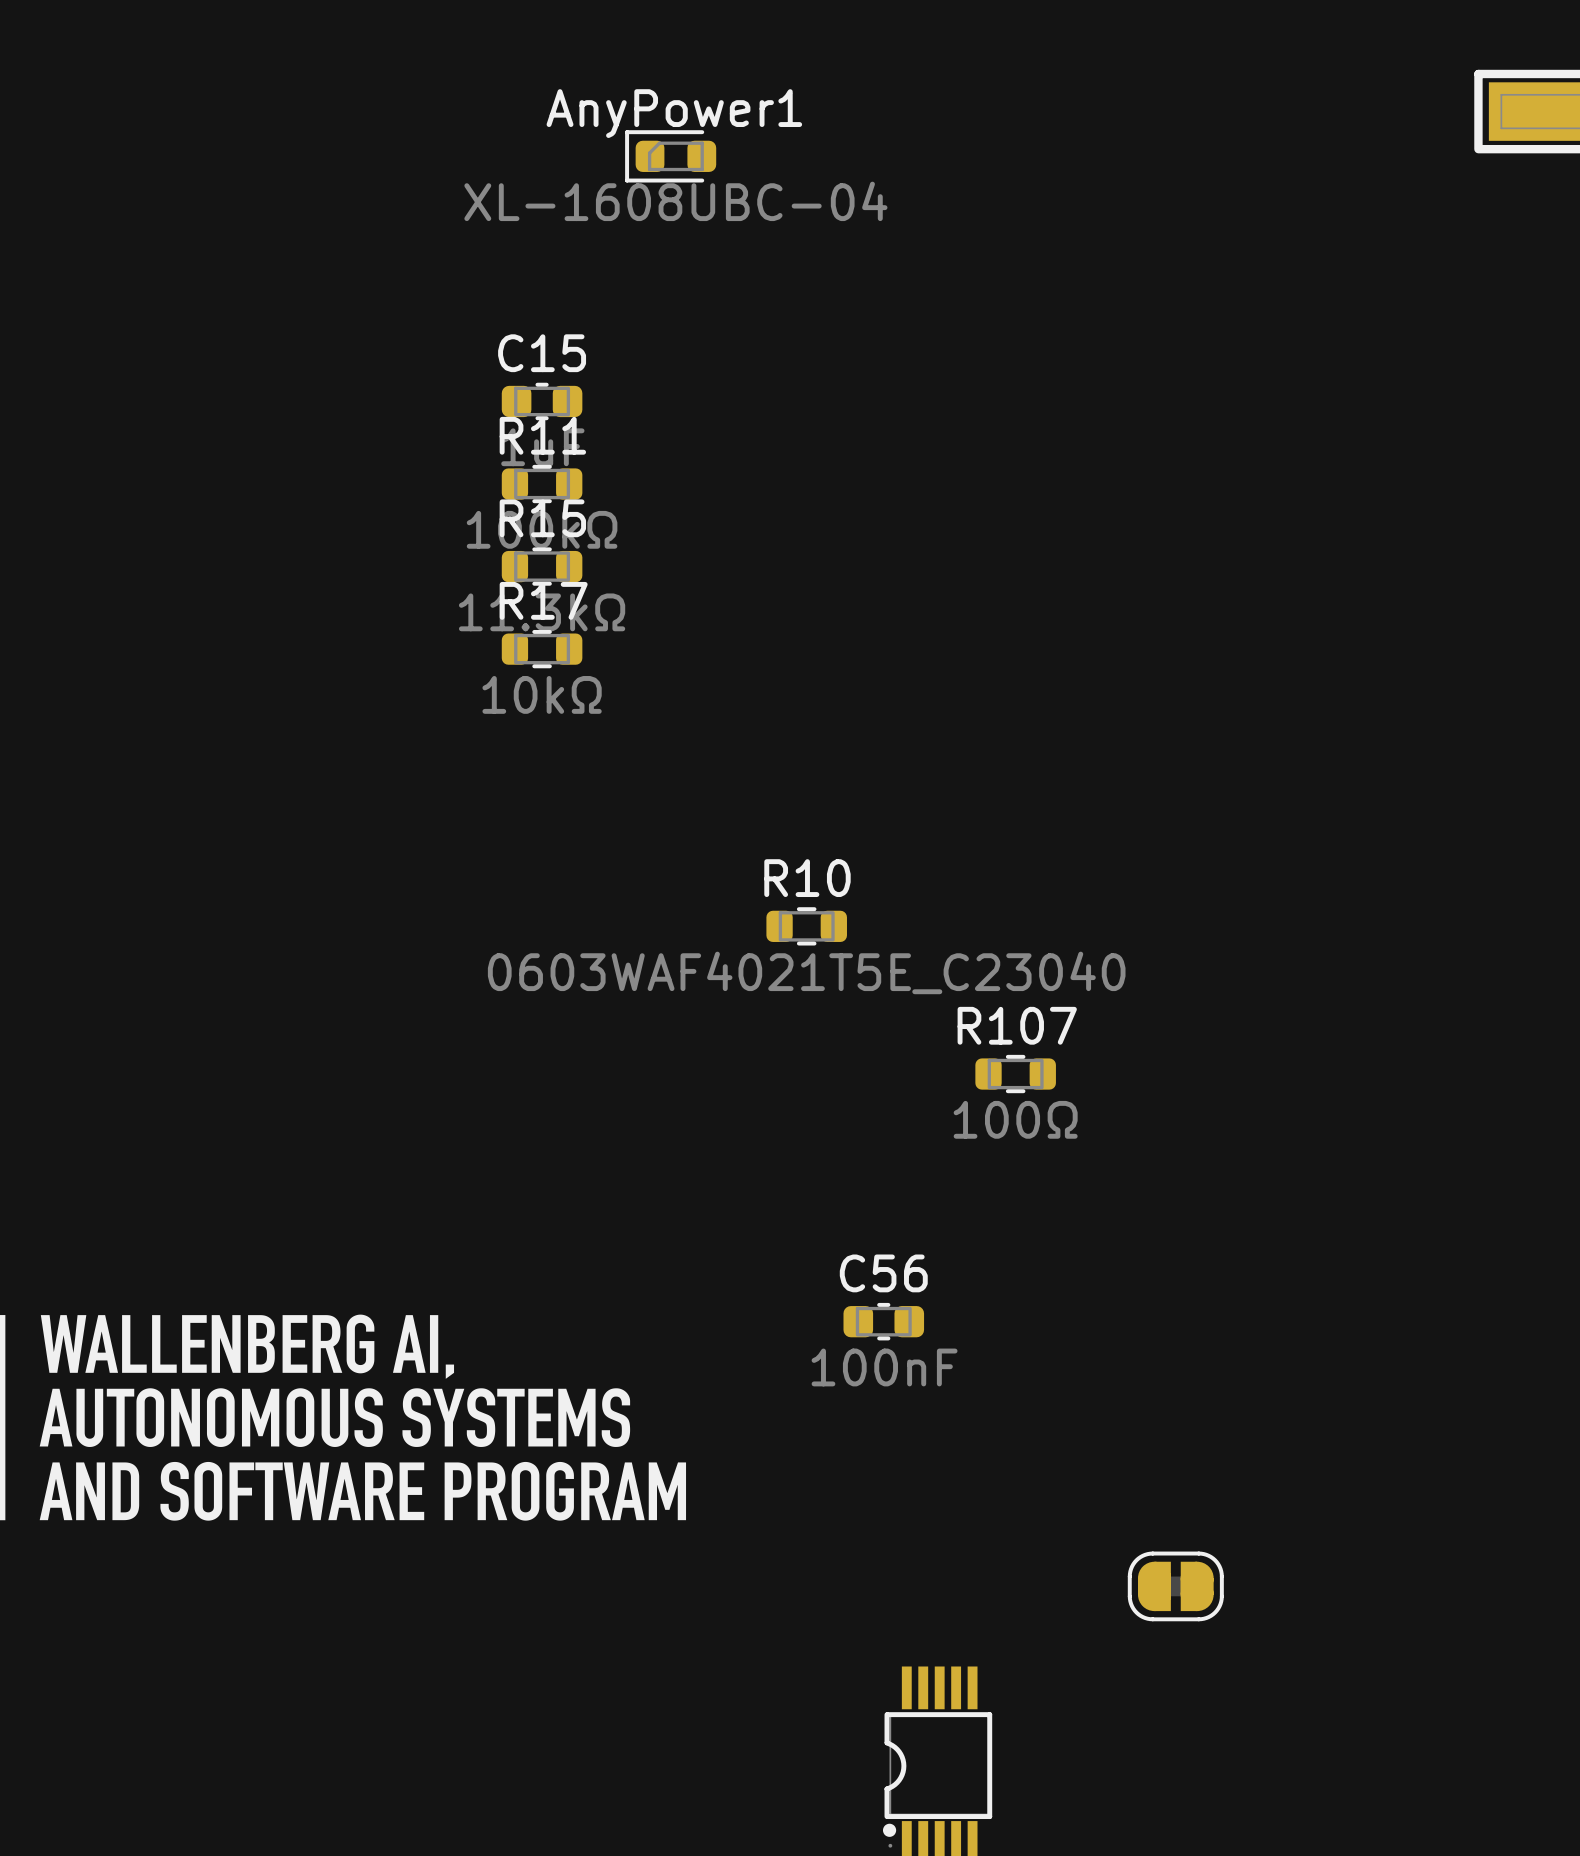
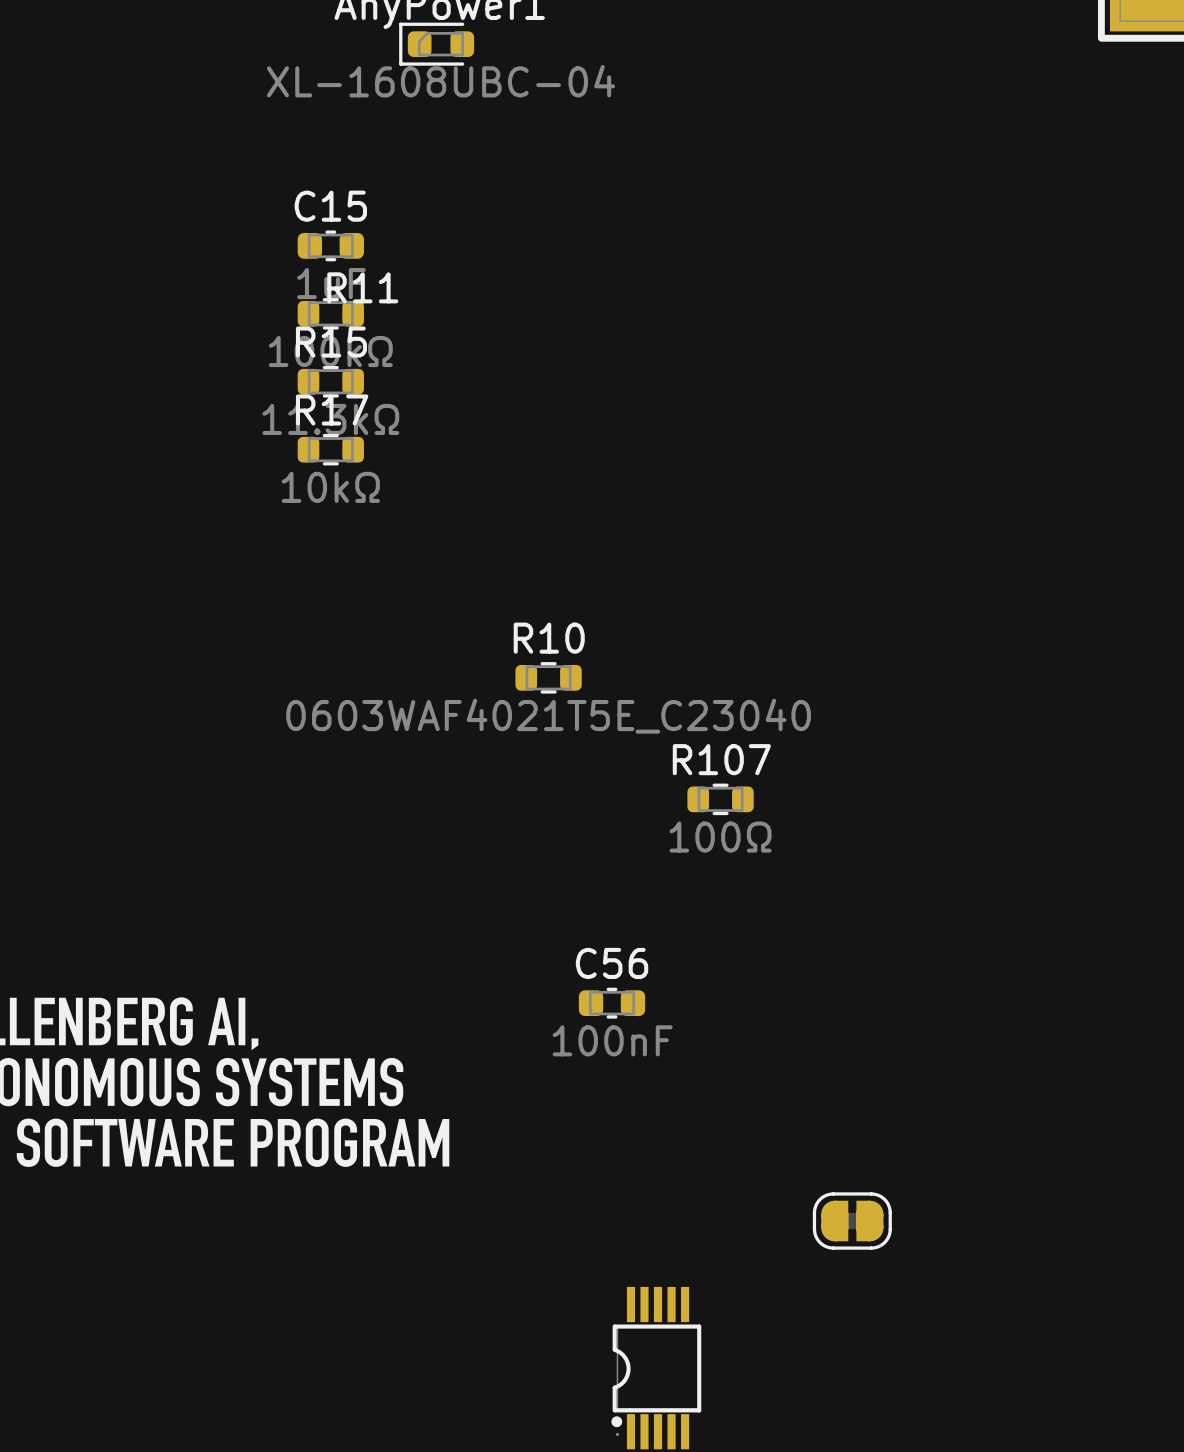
R11 name position: R11 (542, 435) -> R11 (362, 287)

